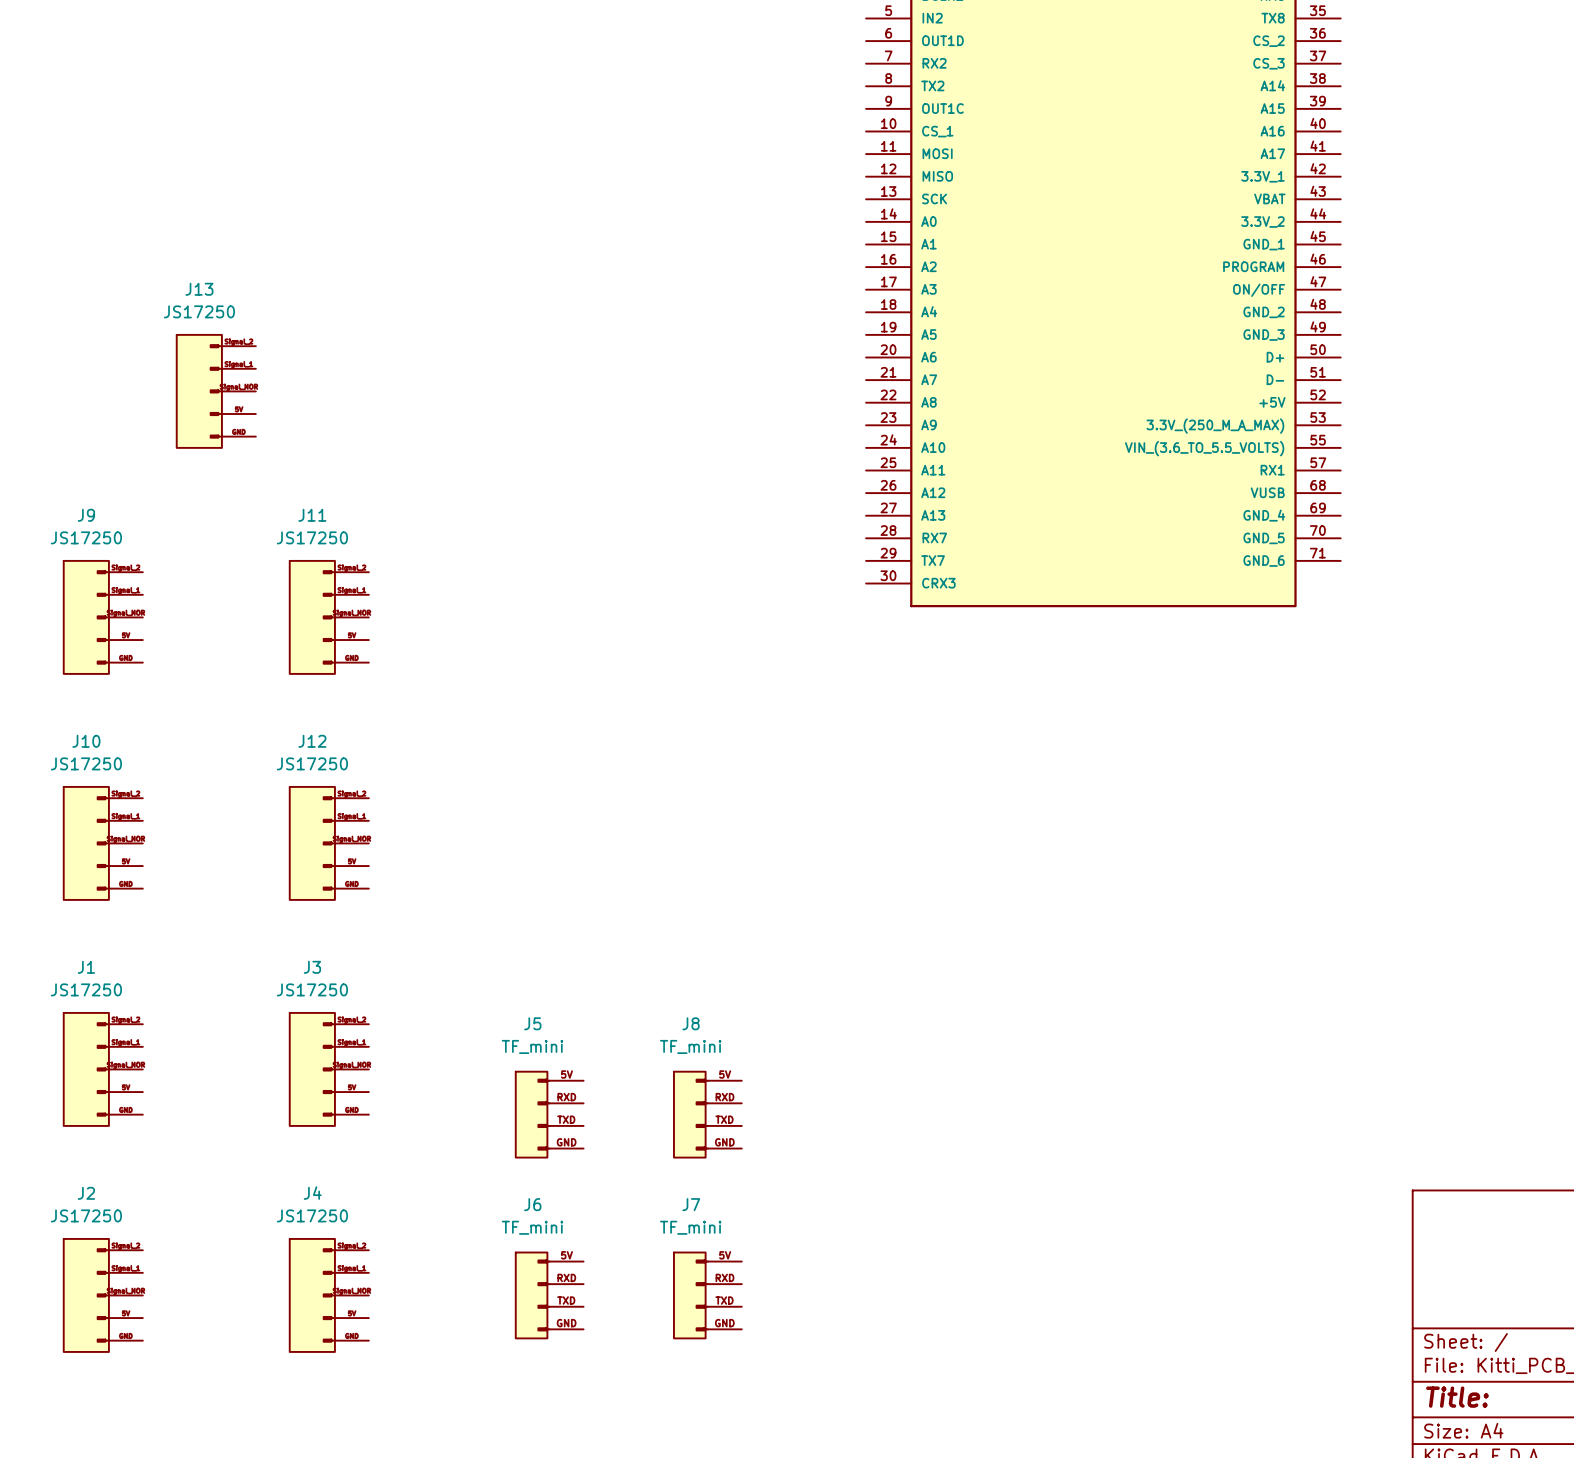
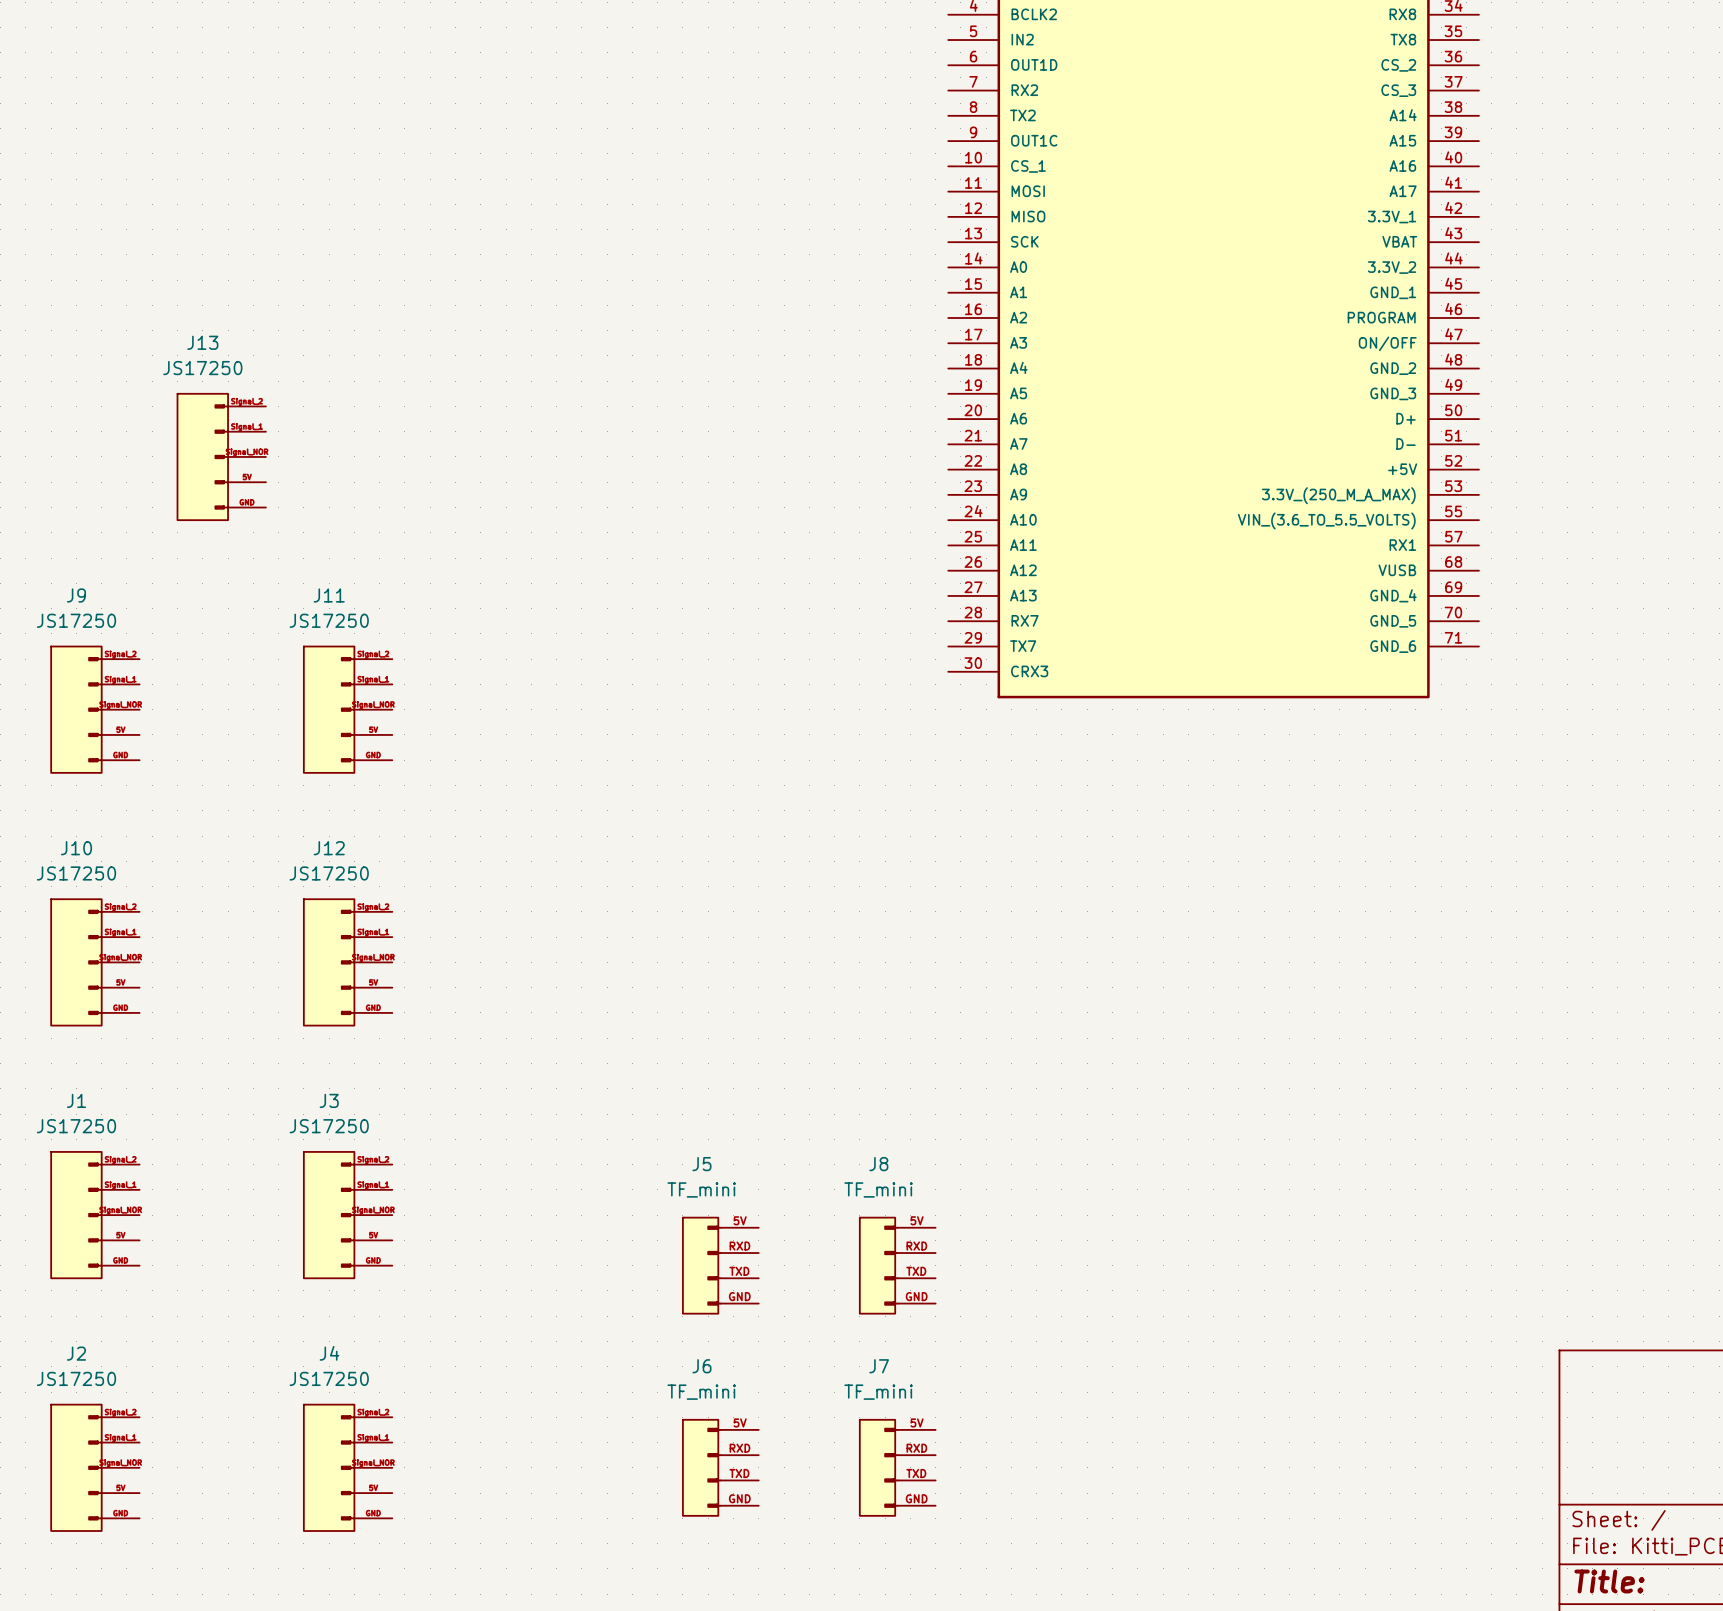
J5 position: (549, 1114) -> (720, 1265)
J8 position: (707, 1114) -> (897, 1265)
J6 position: (549, 1295) -> (720, 1467)
J7 position: (707, 1295) -> (897, 1467)

